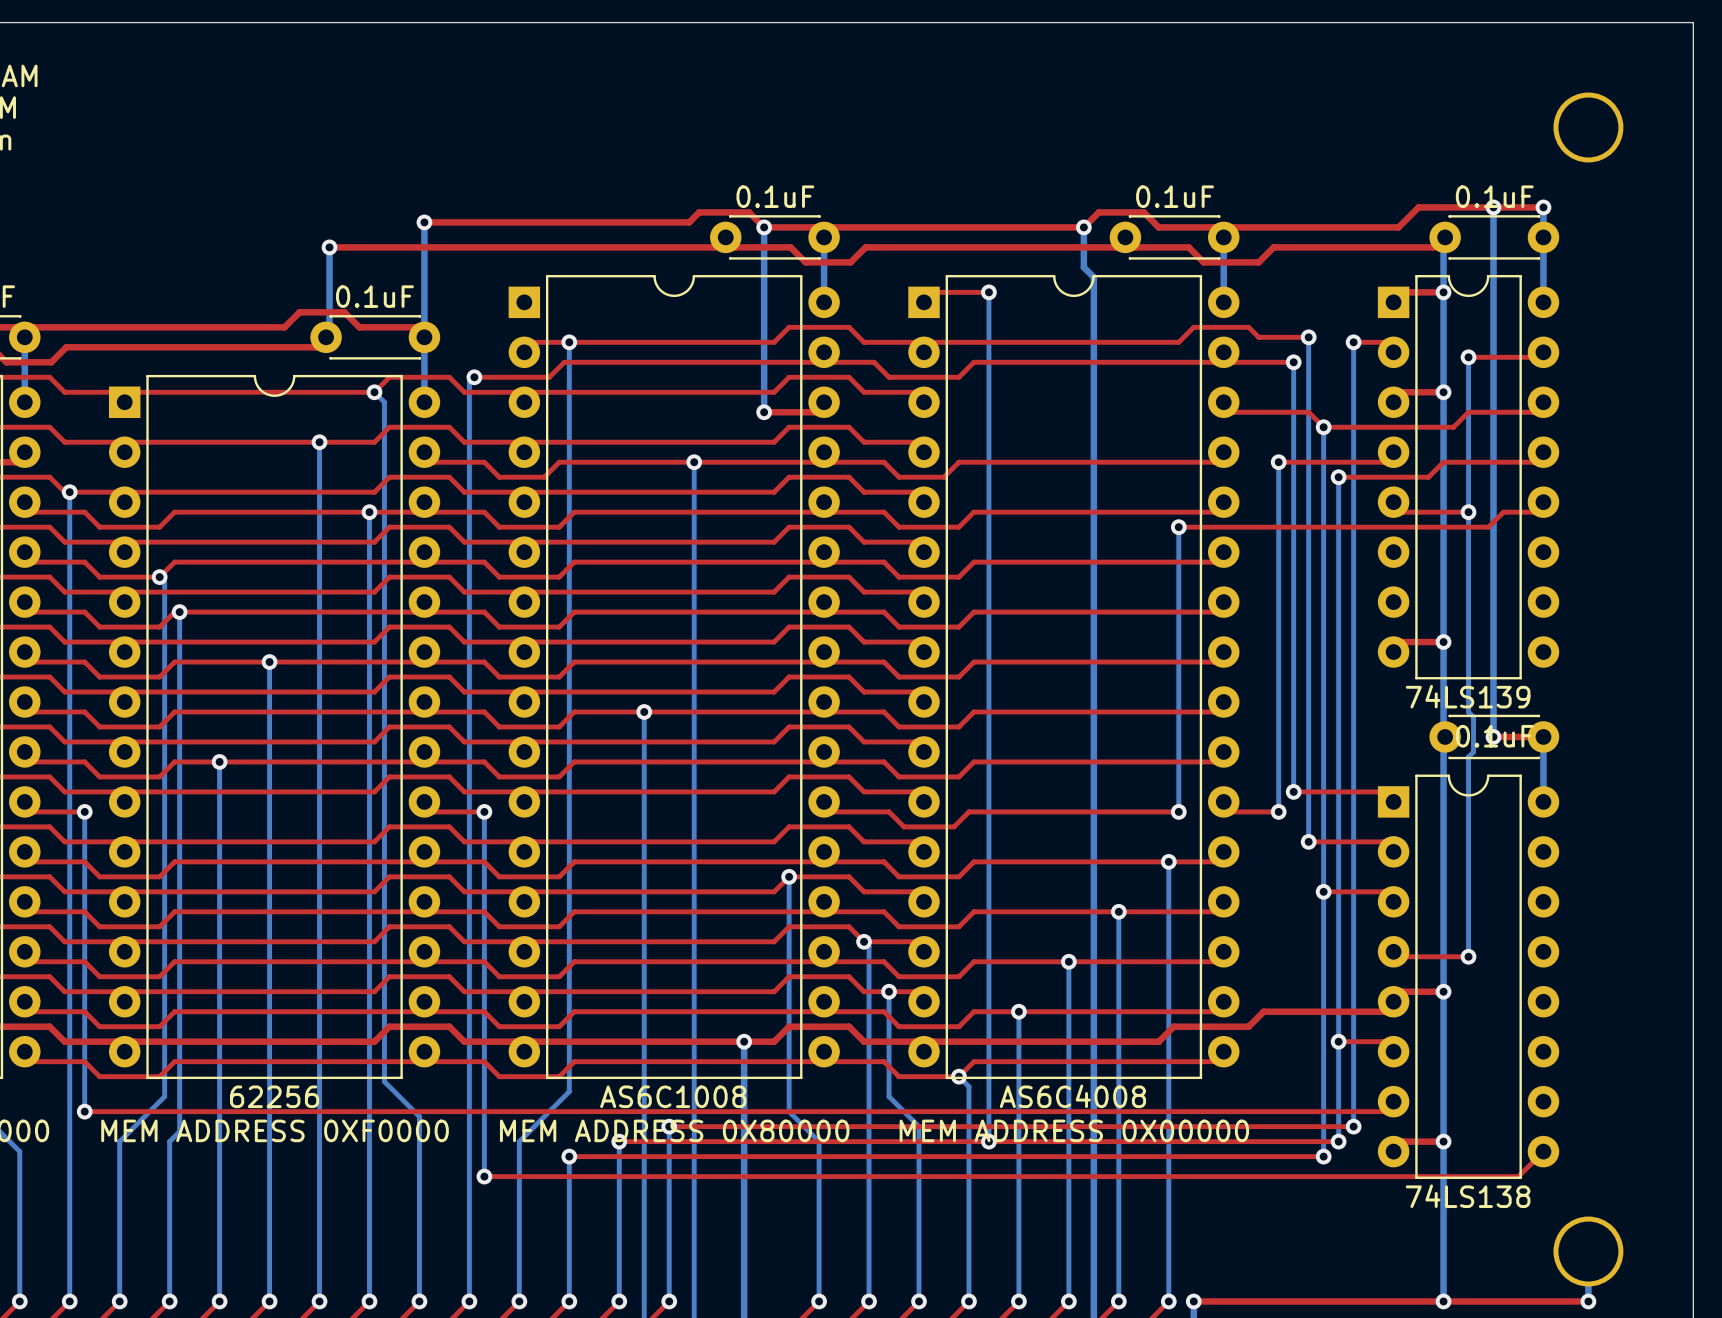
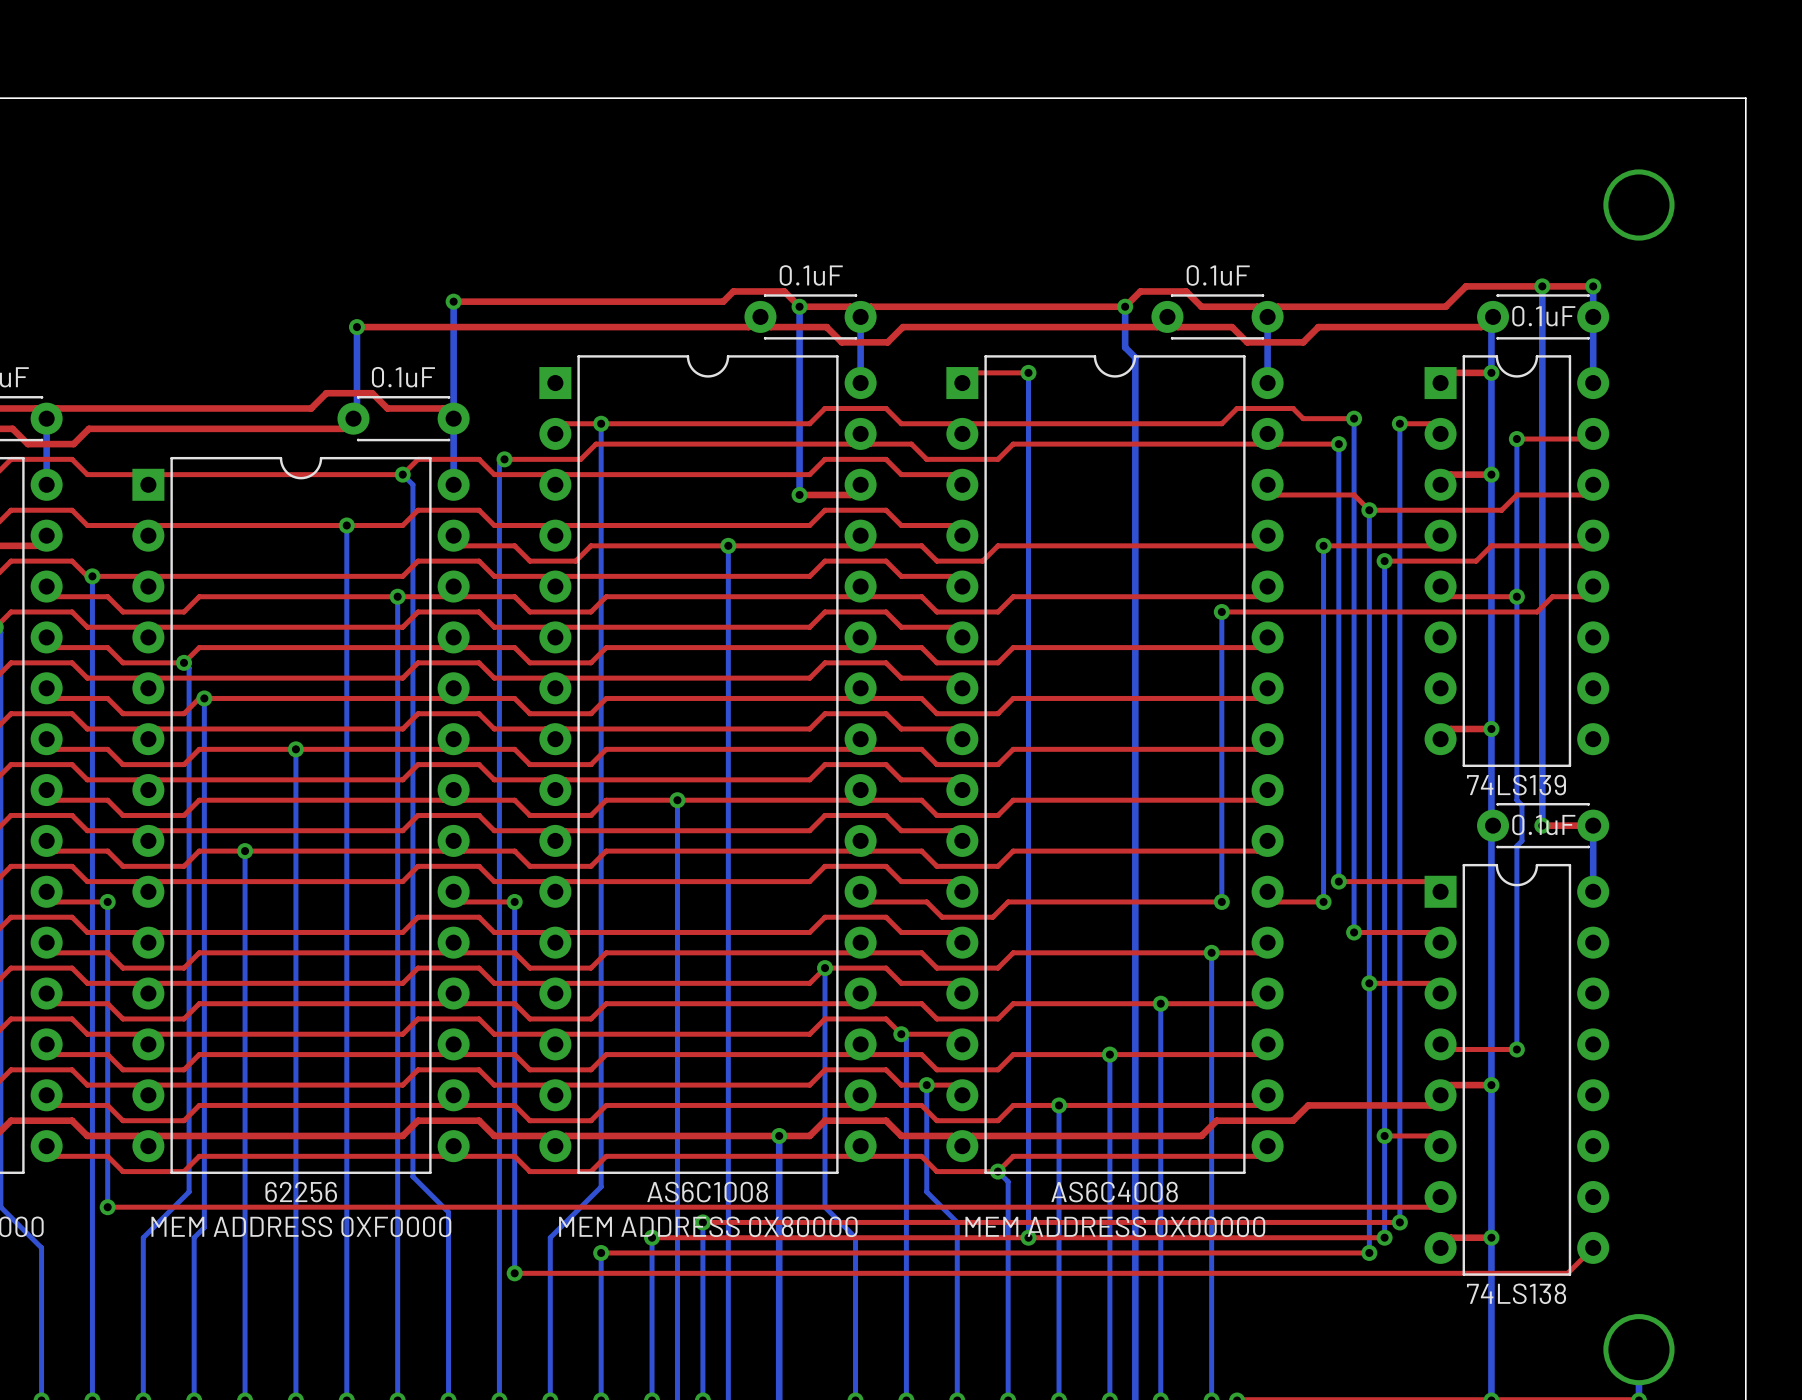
part value position: 0.1uF (1494, 196) -> 0.1uF (1543, 316)

